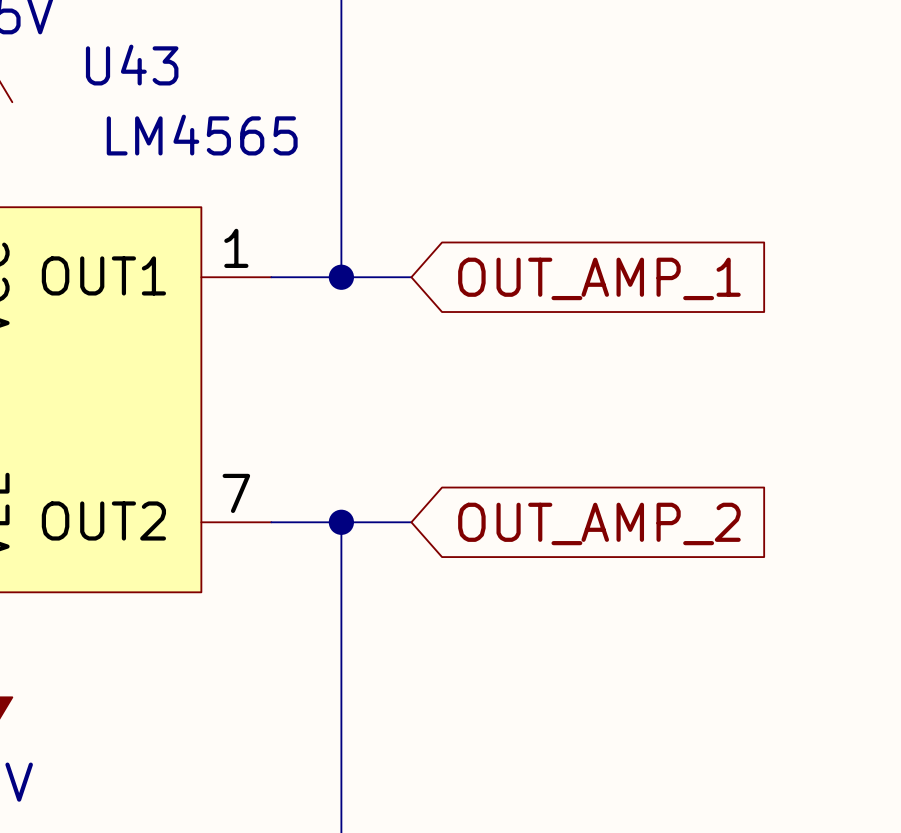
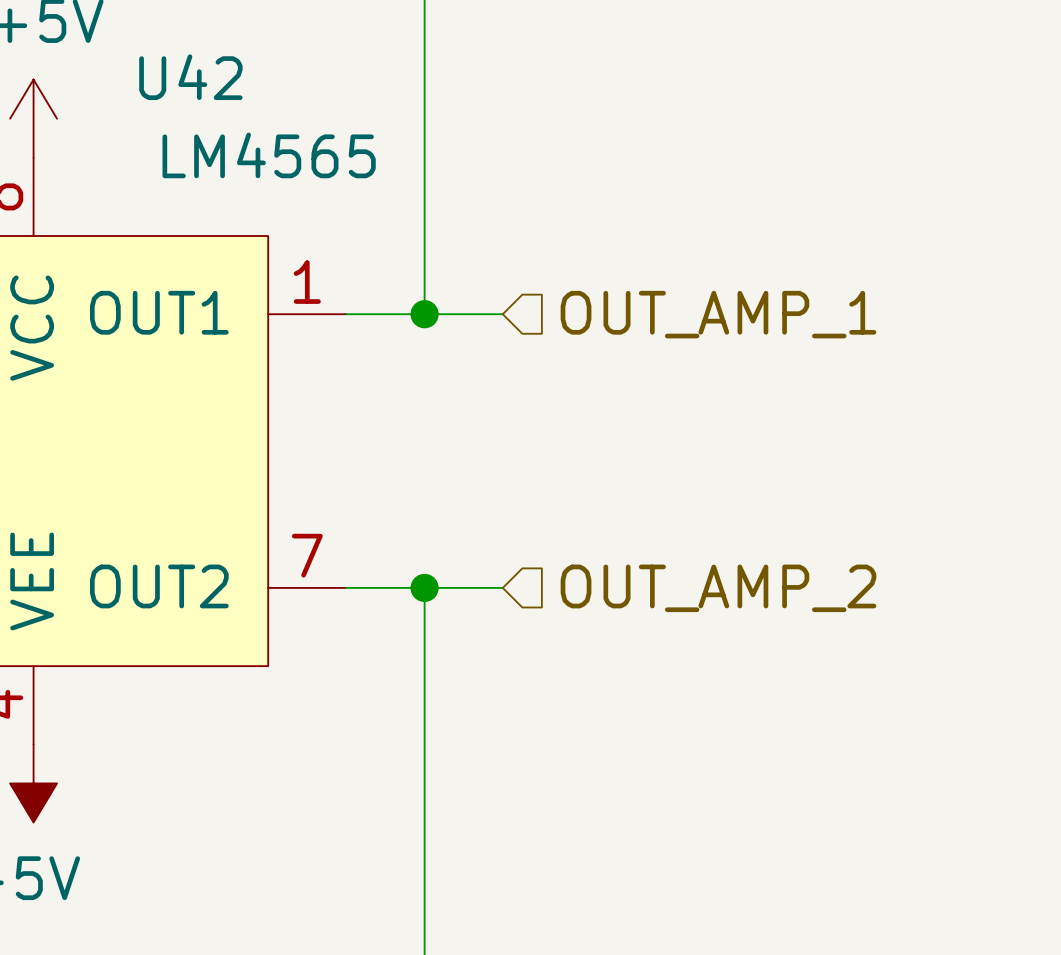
U43 name: U43 (132, 65) -> U42 (190, 77)
hierarchical label: none -> OUT_AMP_1 (718, 314)
global label: OUT_AMP_1 (599, 278) -> none
hierarchical label: none -> OUT_AMP_2 (718, 588)
global label: OUT_AMP_2 (599, 523) -> none

